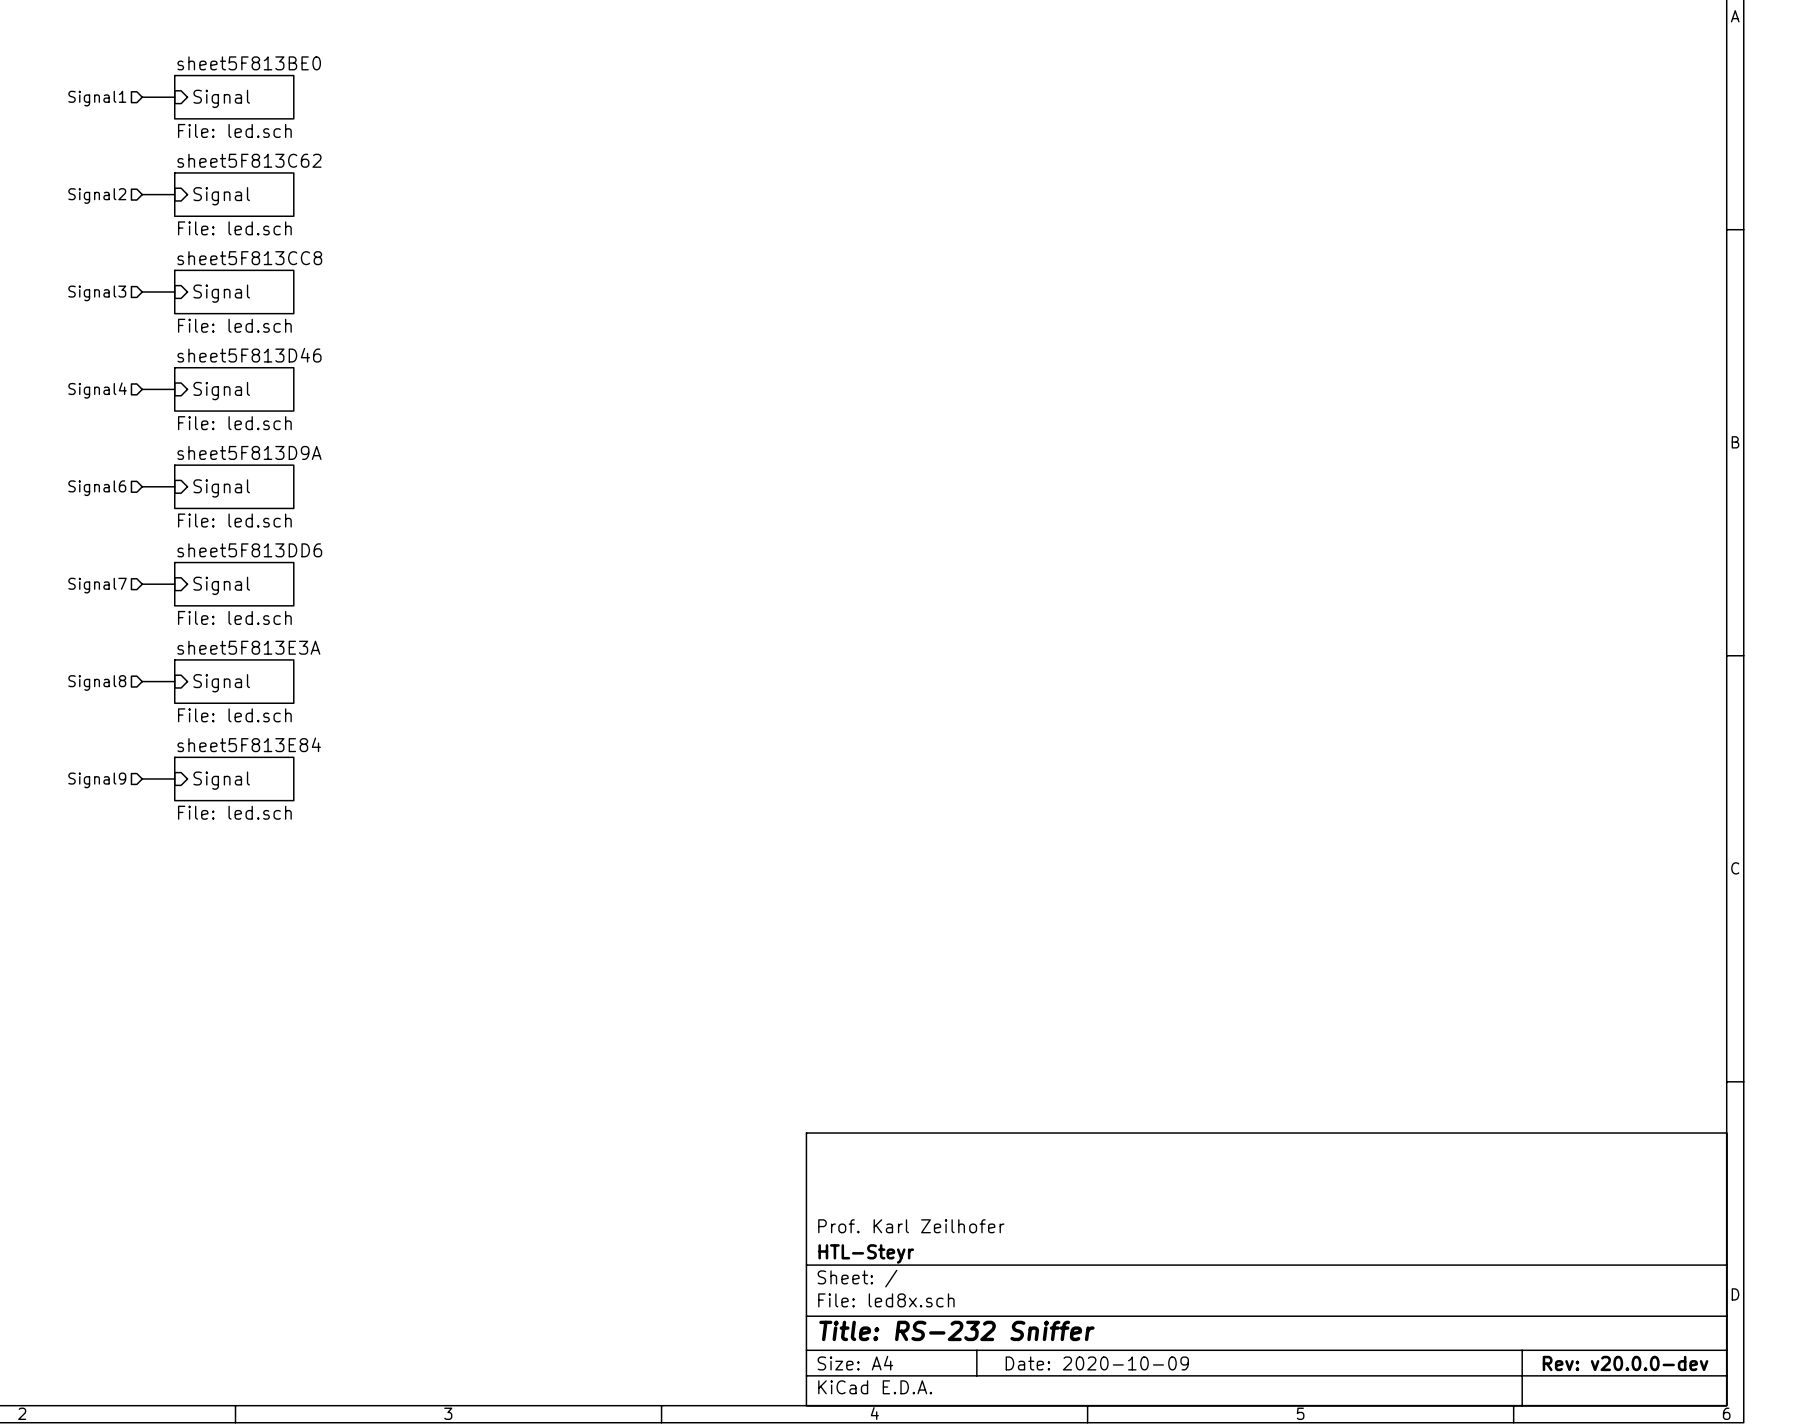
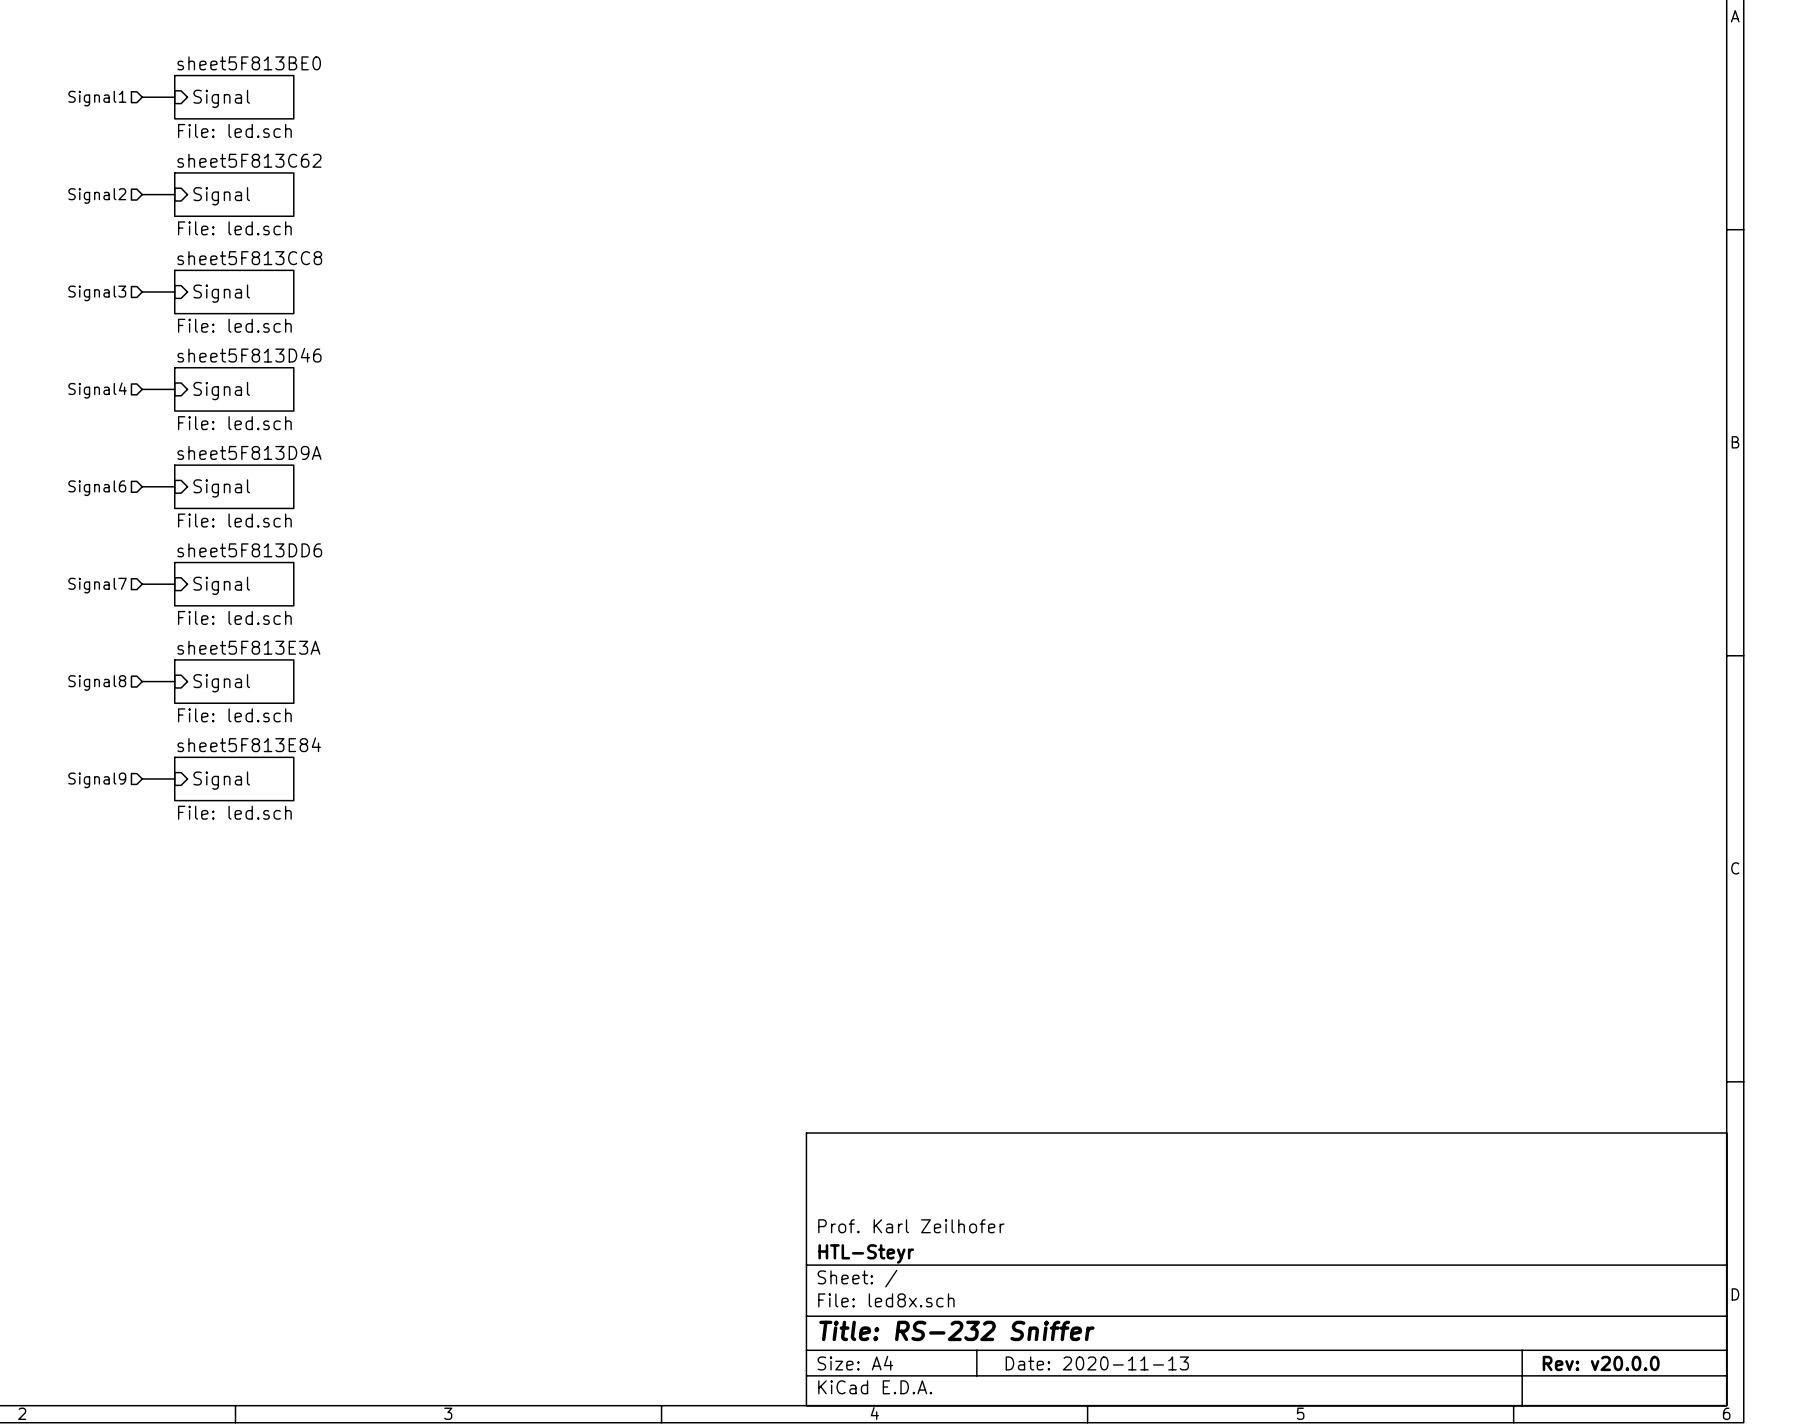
title block: Date: 2020-10-09 (1097, 1363) -> Date: 2020-11-13 (1097, 1363)
title block: Rev: v20.0.0-dev (1625, 1363) -> Rev: v20.0.0 (1601, 1363)

